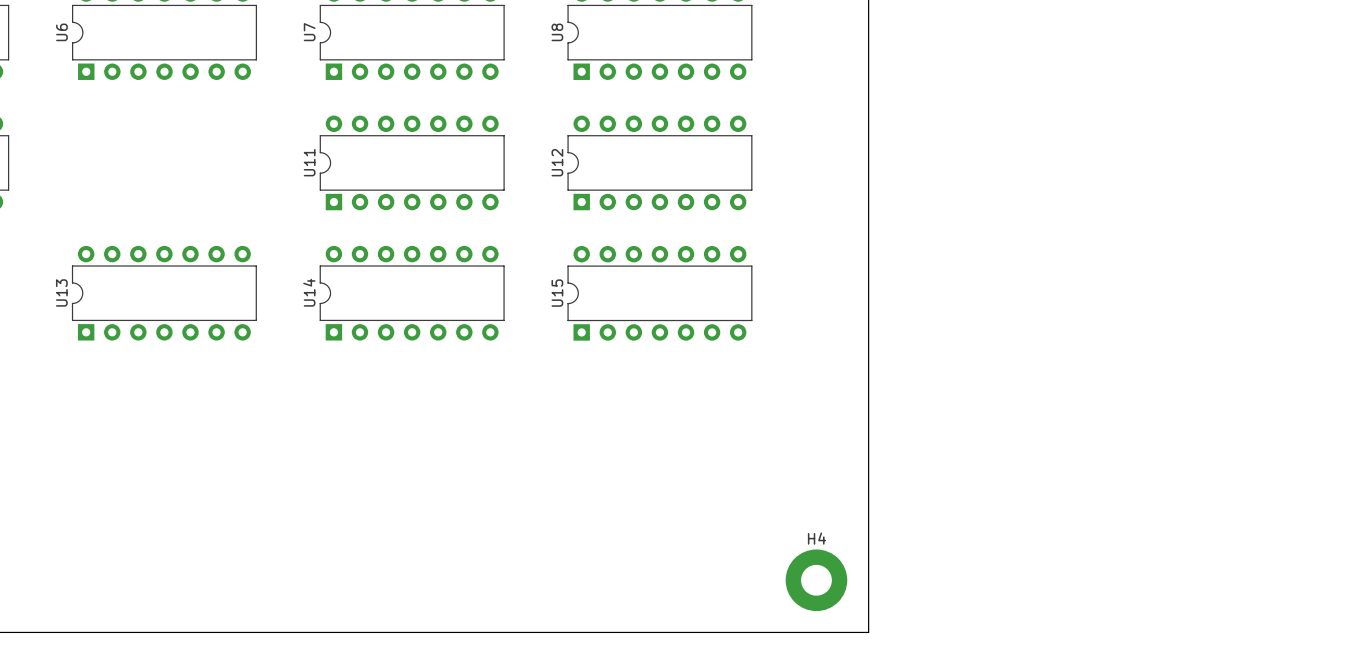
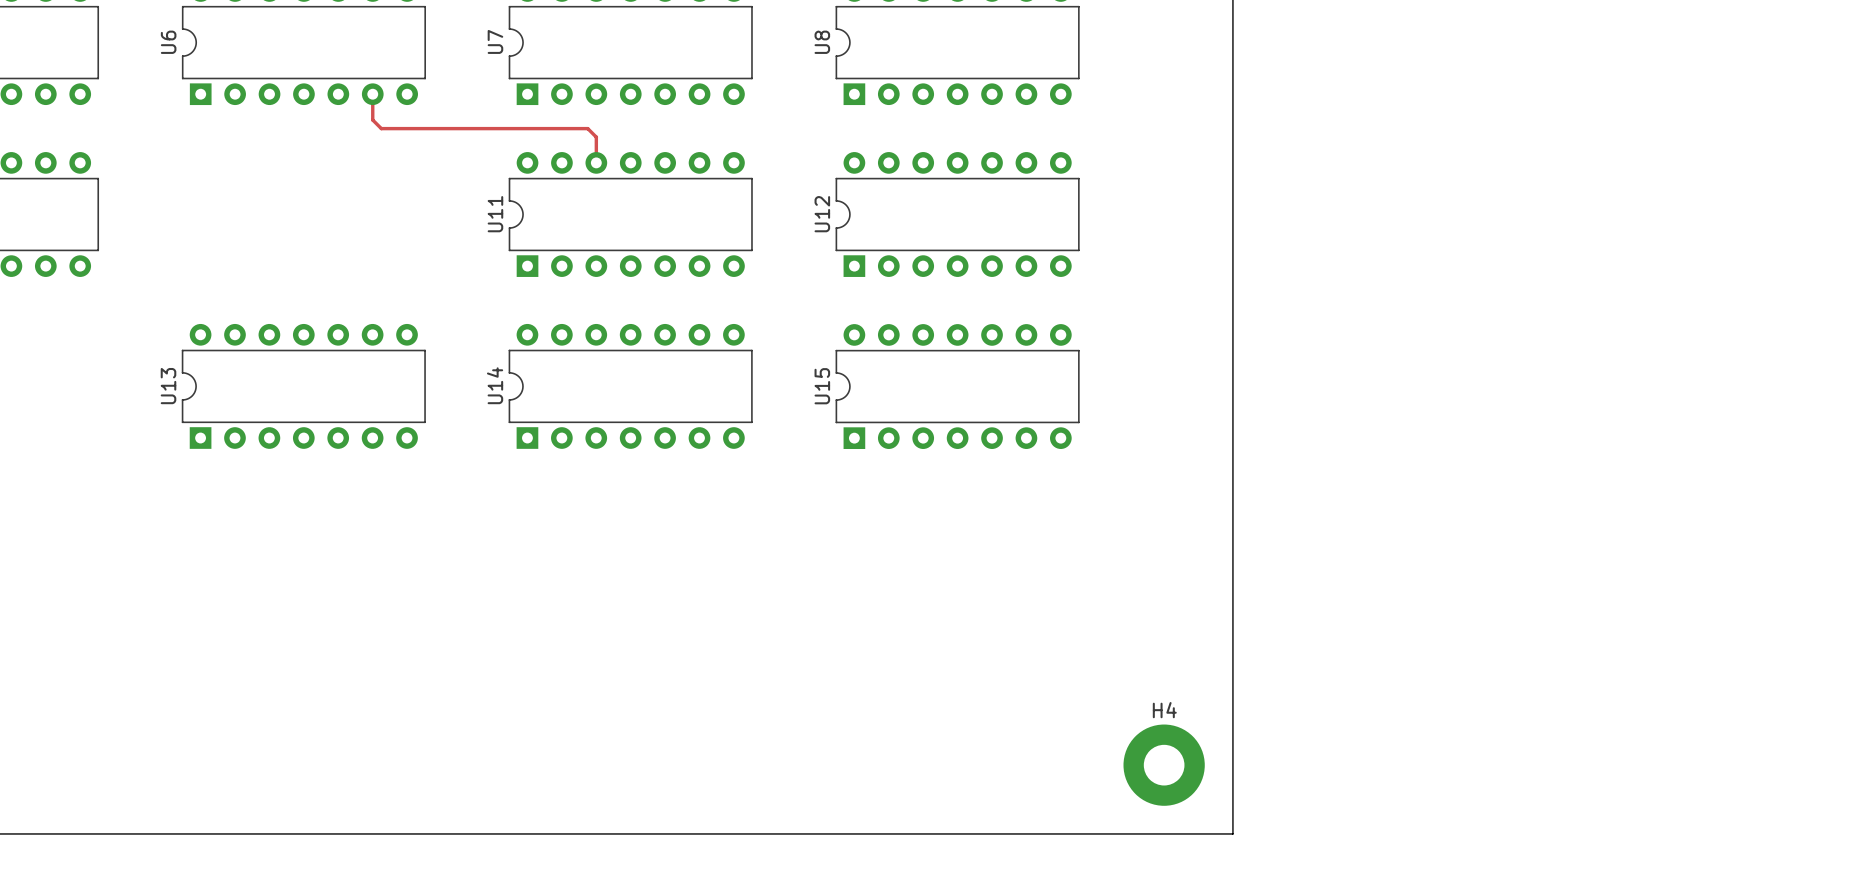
track: none -> (372, 94) (372, 120) (381, 128) (587, 128) (596, 137)
track: none -> (596, 137) (596, 162)

